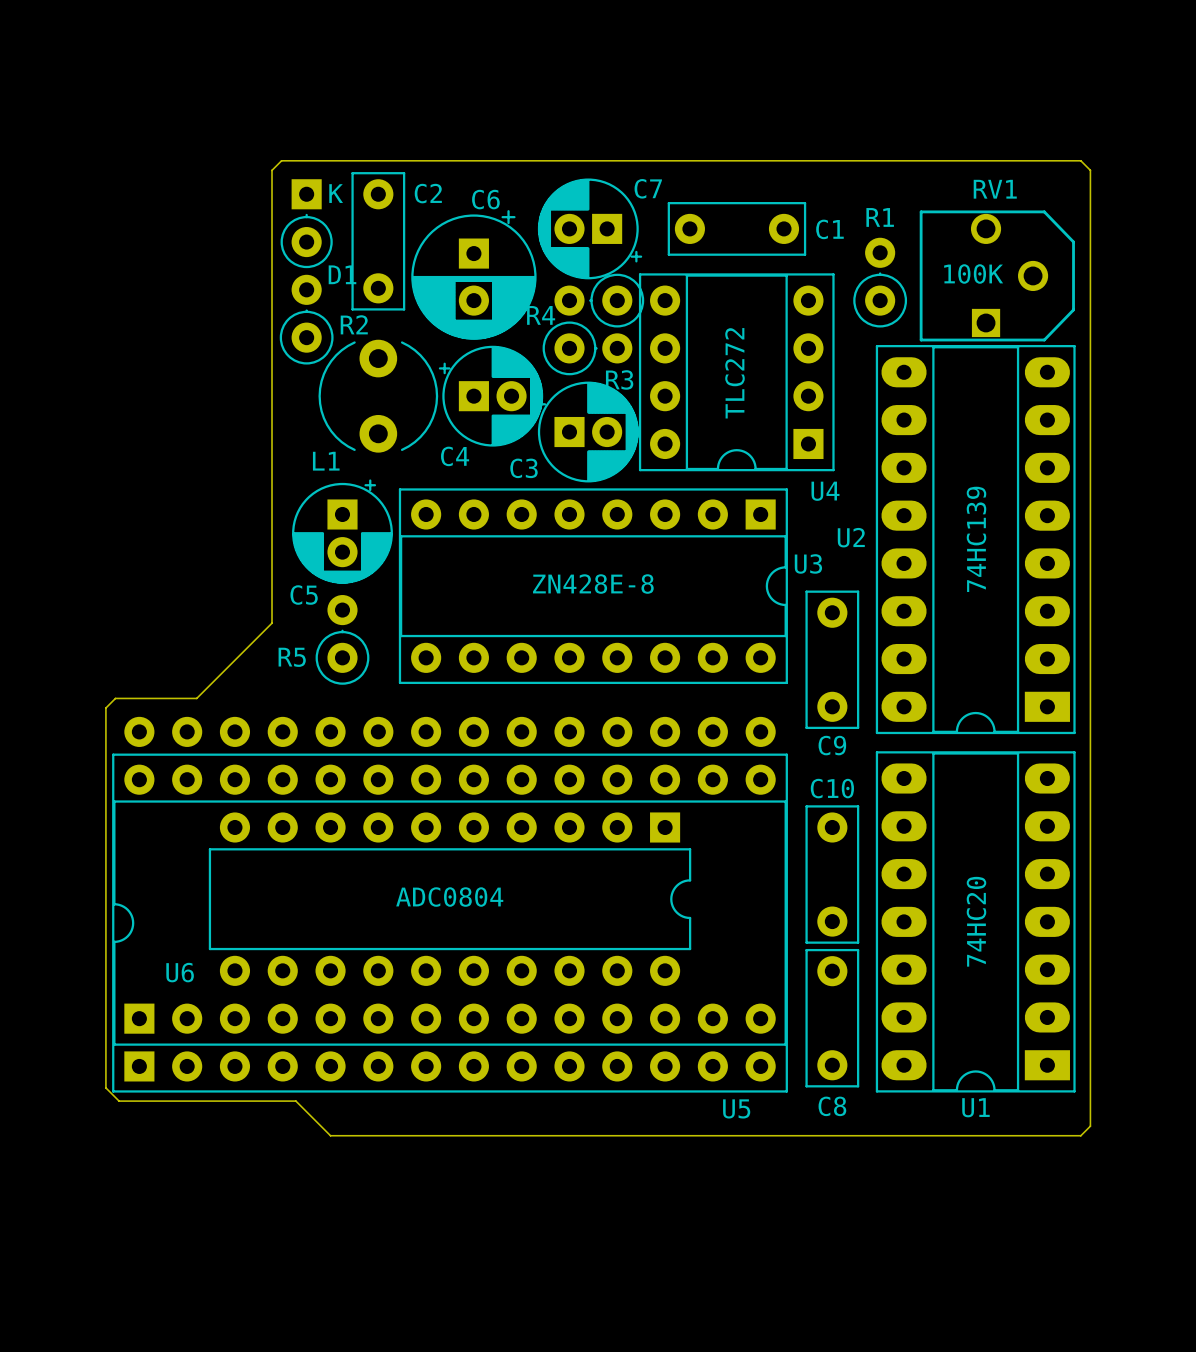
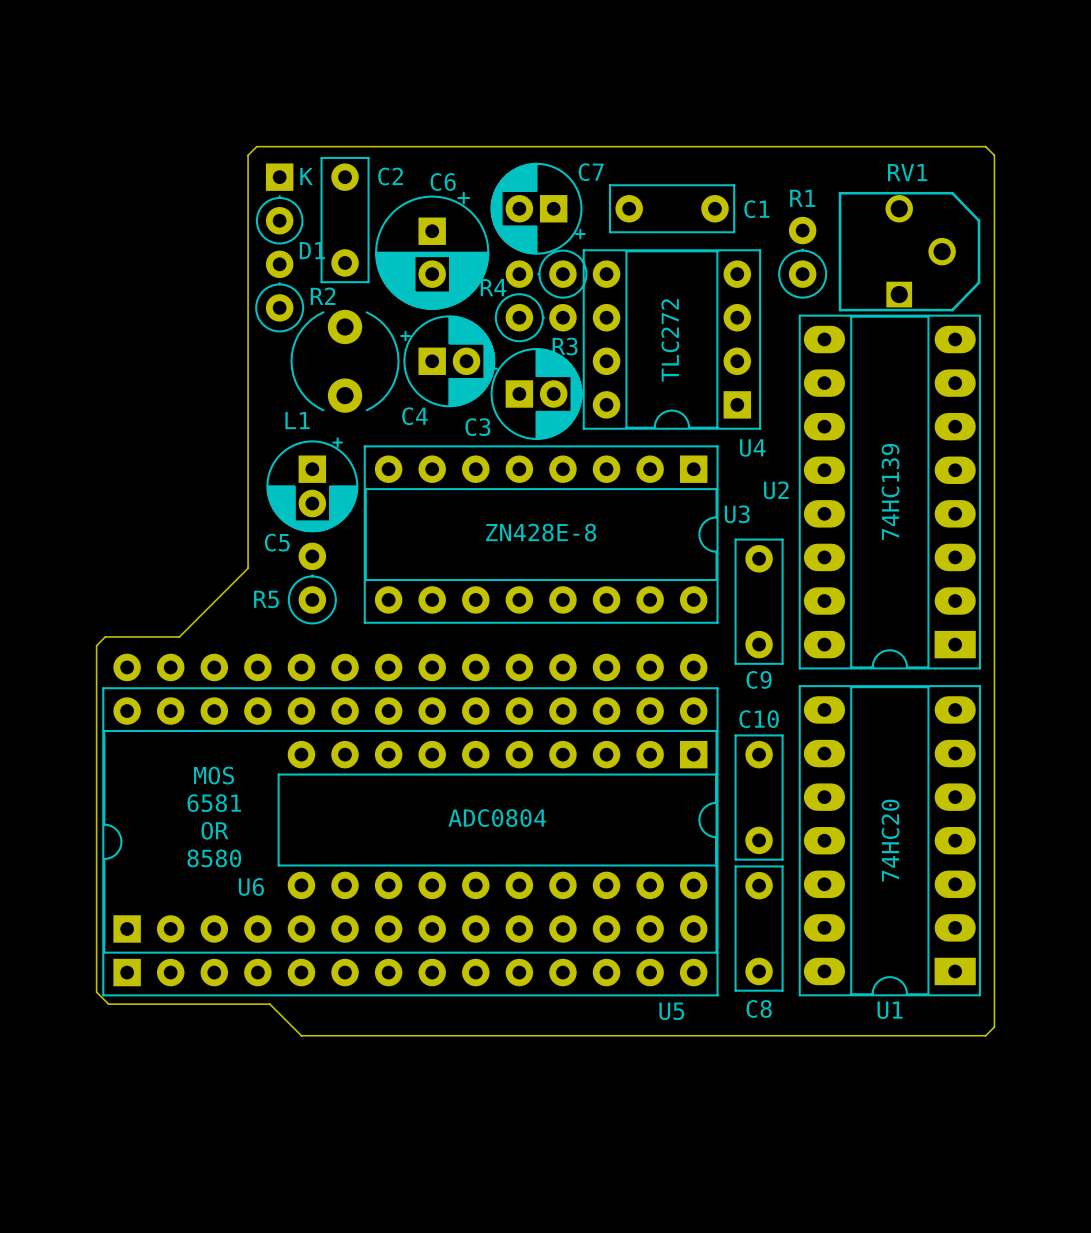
RV1 value: 100K (973, 273) -> none
text: none -> MOS (214, 775)
text: none -> 6581 (214, 803)
U6 position: (450, 899) -> (497, 820)
text: none -> OR (214, 830)
text: none -> 8580 (214, 858)

